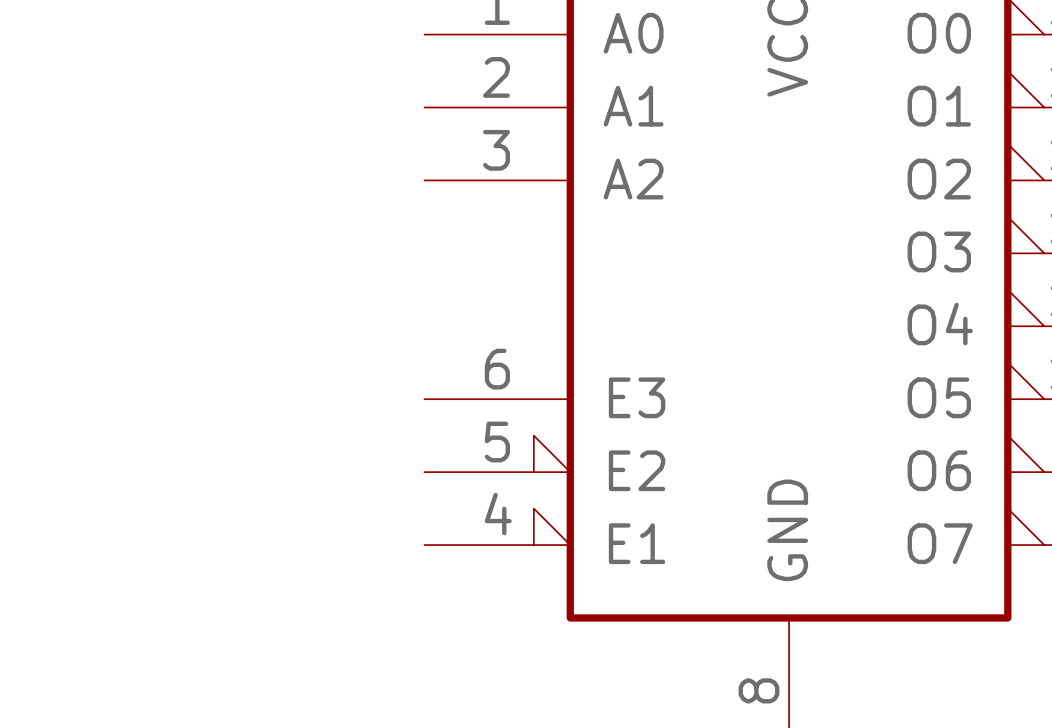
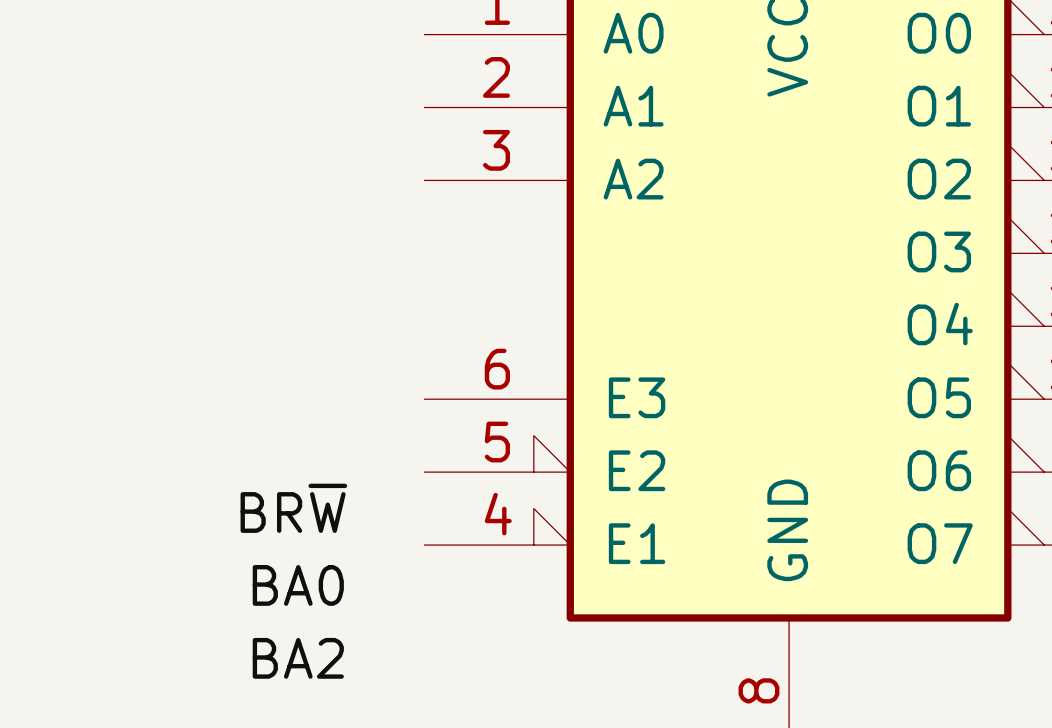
label: none -> BR~{W} (293, 508)
label: none -> BA0 (298, 585)
label: none -> BA2 (298, 658)

